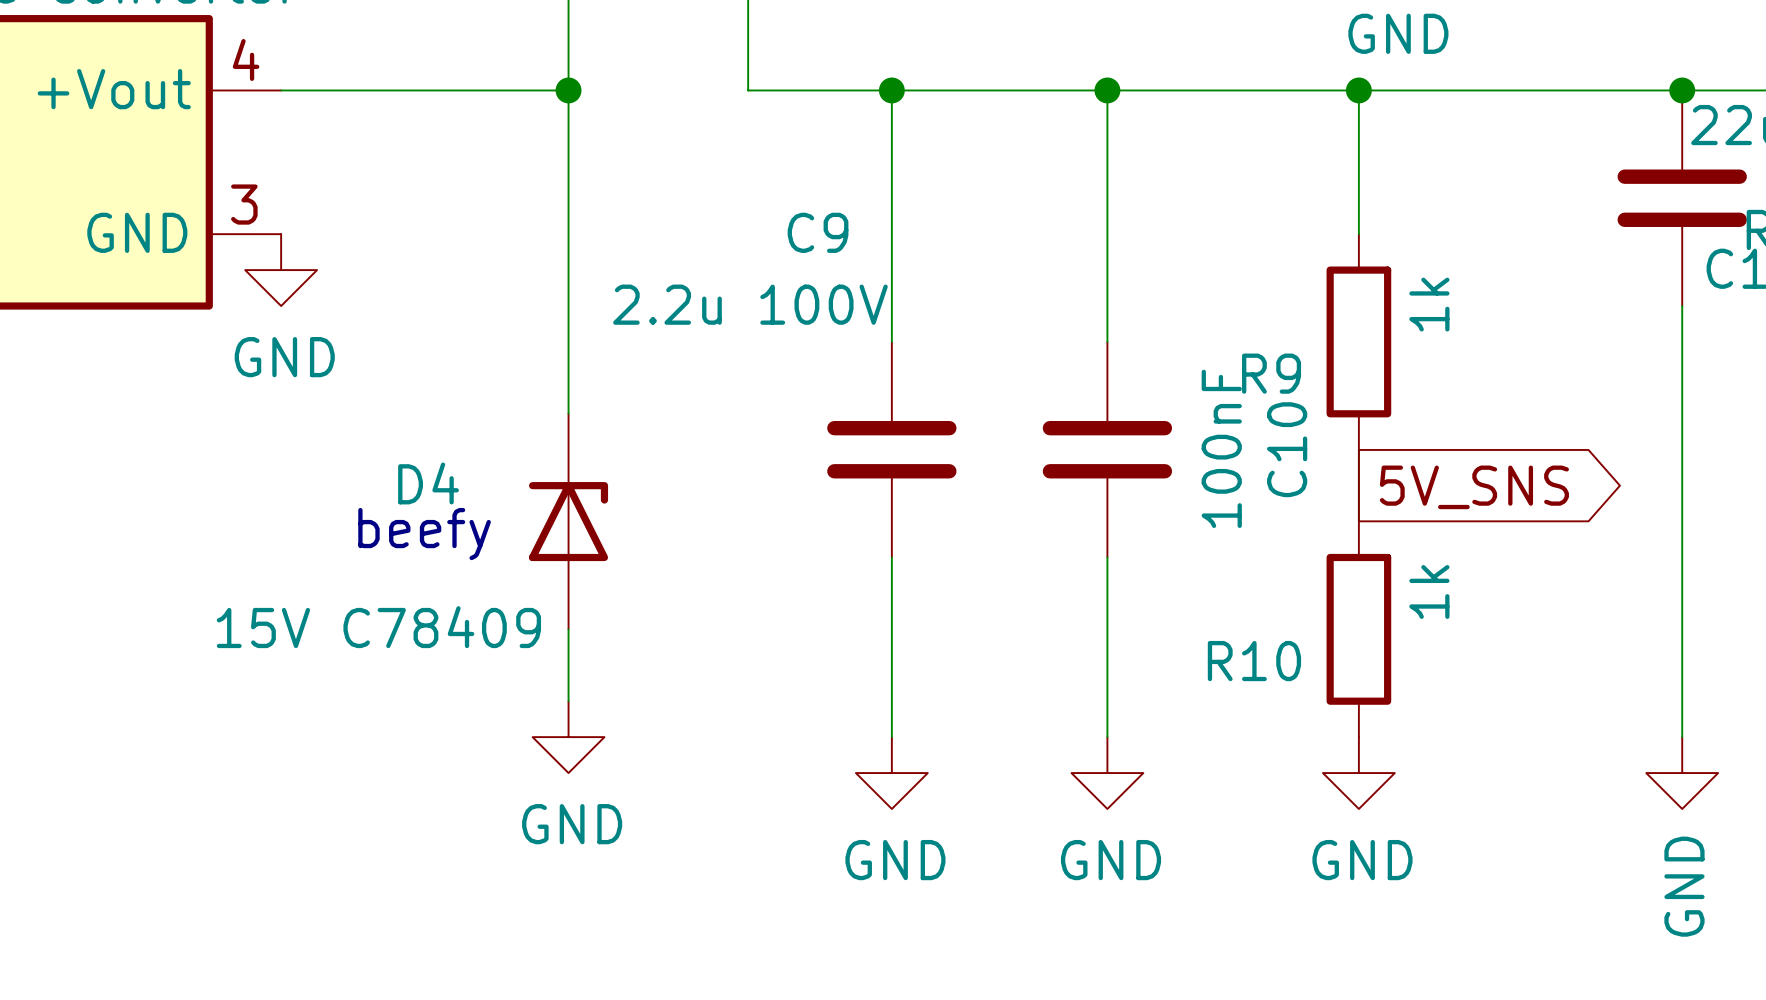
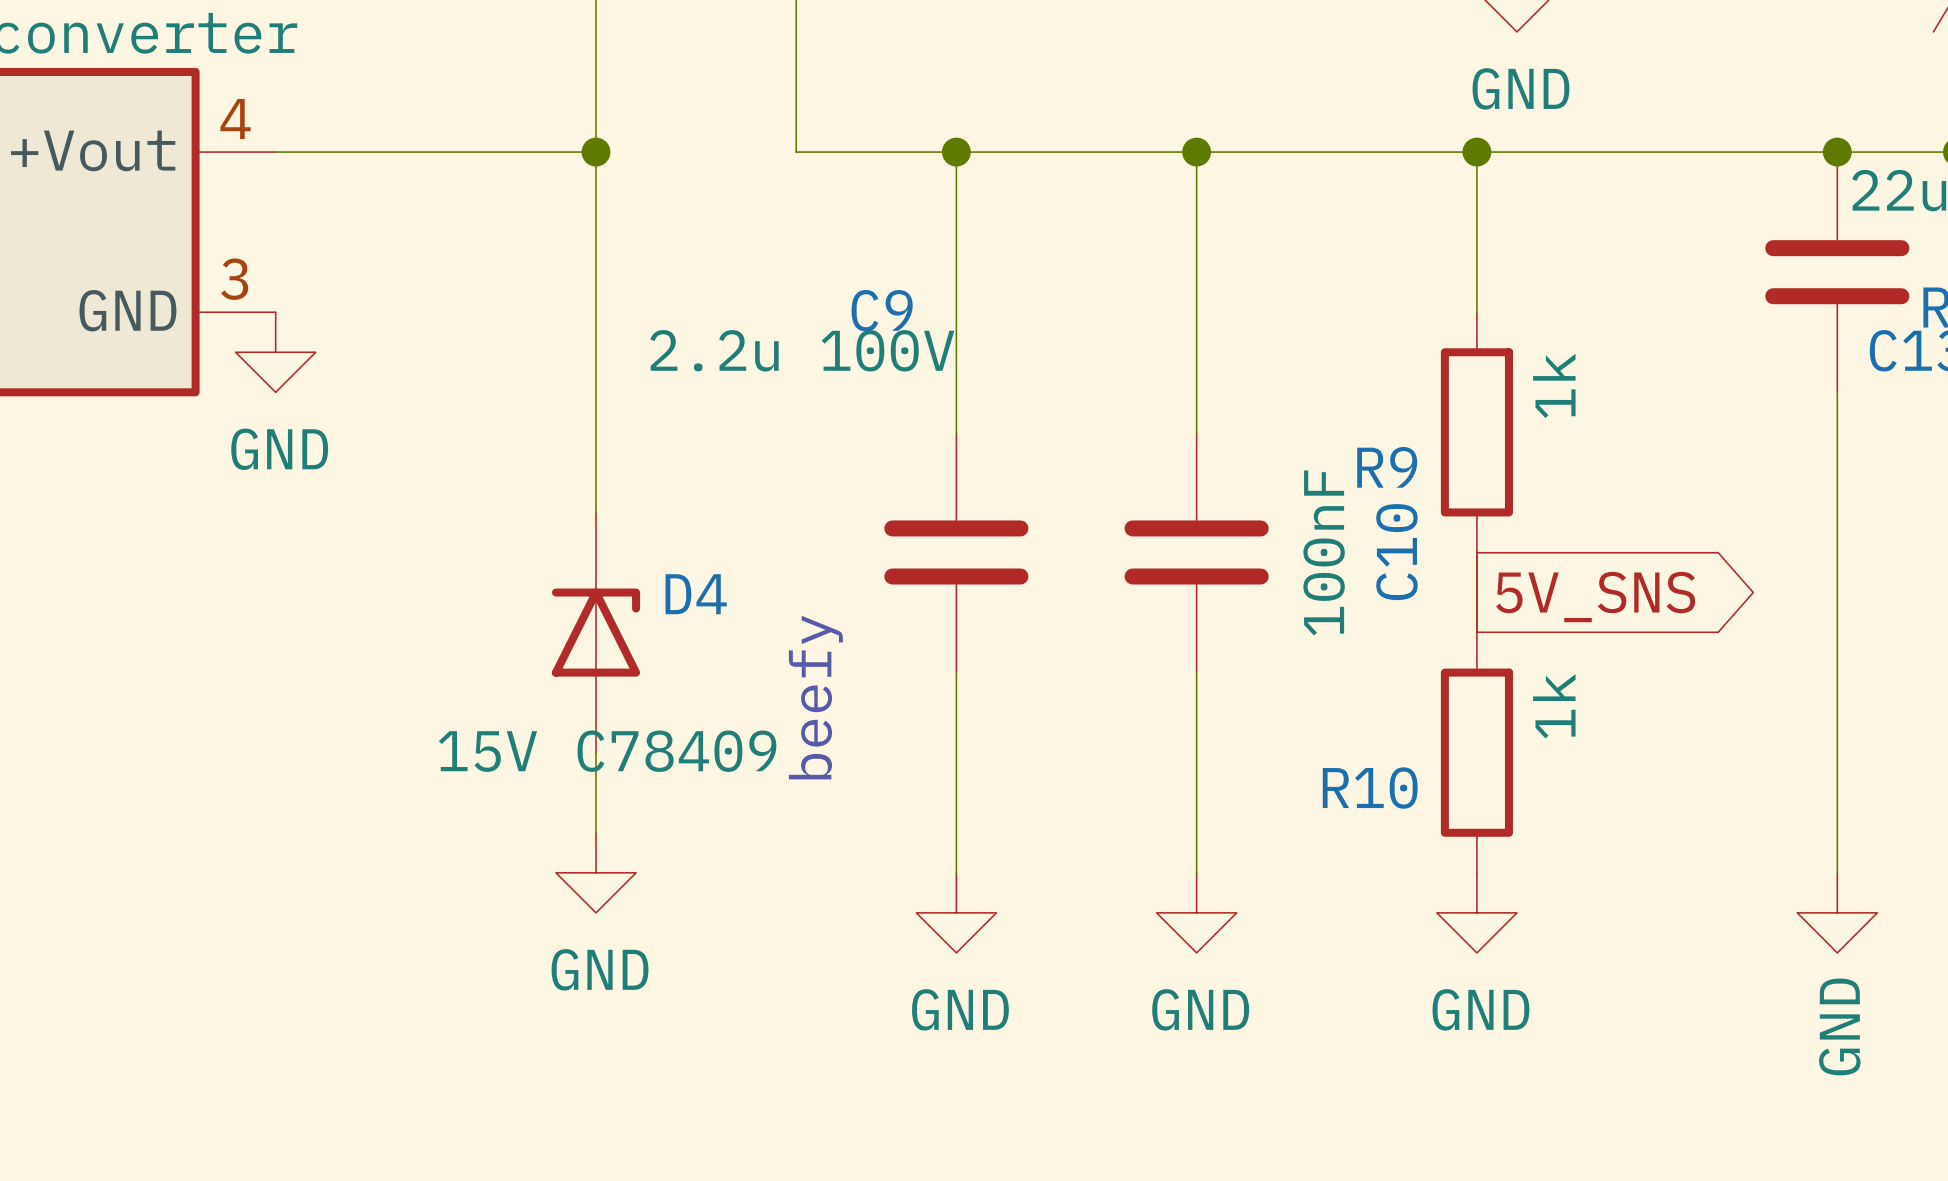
C9 value position: 2.2u 100V (750, 304) -> 2.2u 100V (802, 350)
D4 name position: D4 (428, 483) -> D4 (696, 594)
text rotation: 0° (424, 534) -> 90° counterclockwise (815, 697)
text position: beefy (424, 534) -> beefy (815, 697)
D4 value position: 15V C78409 (378, 627) -> 15V C78409 (607, 751)

